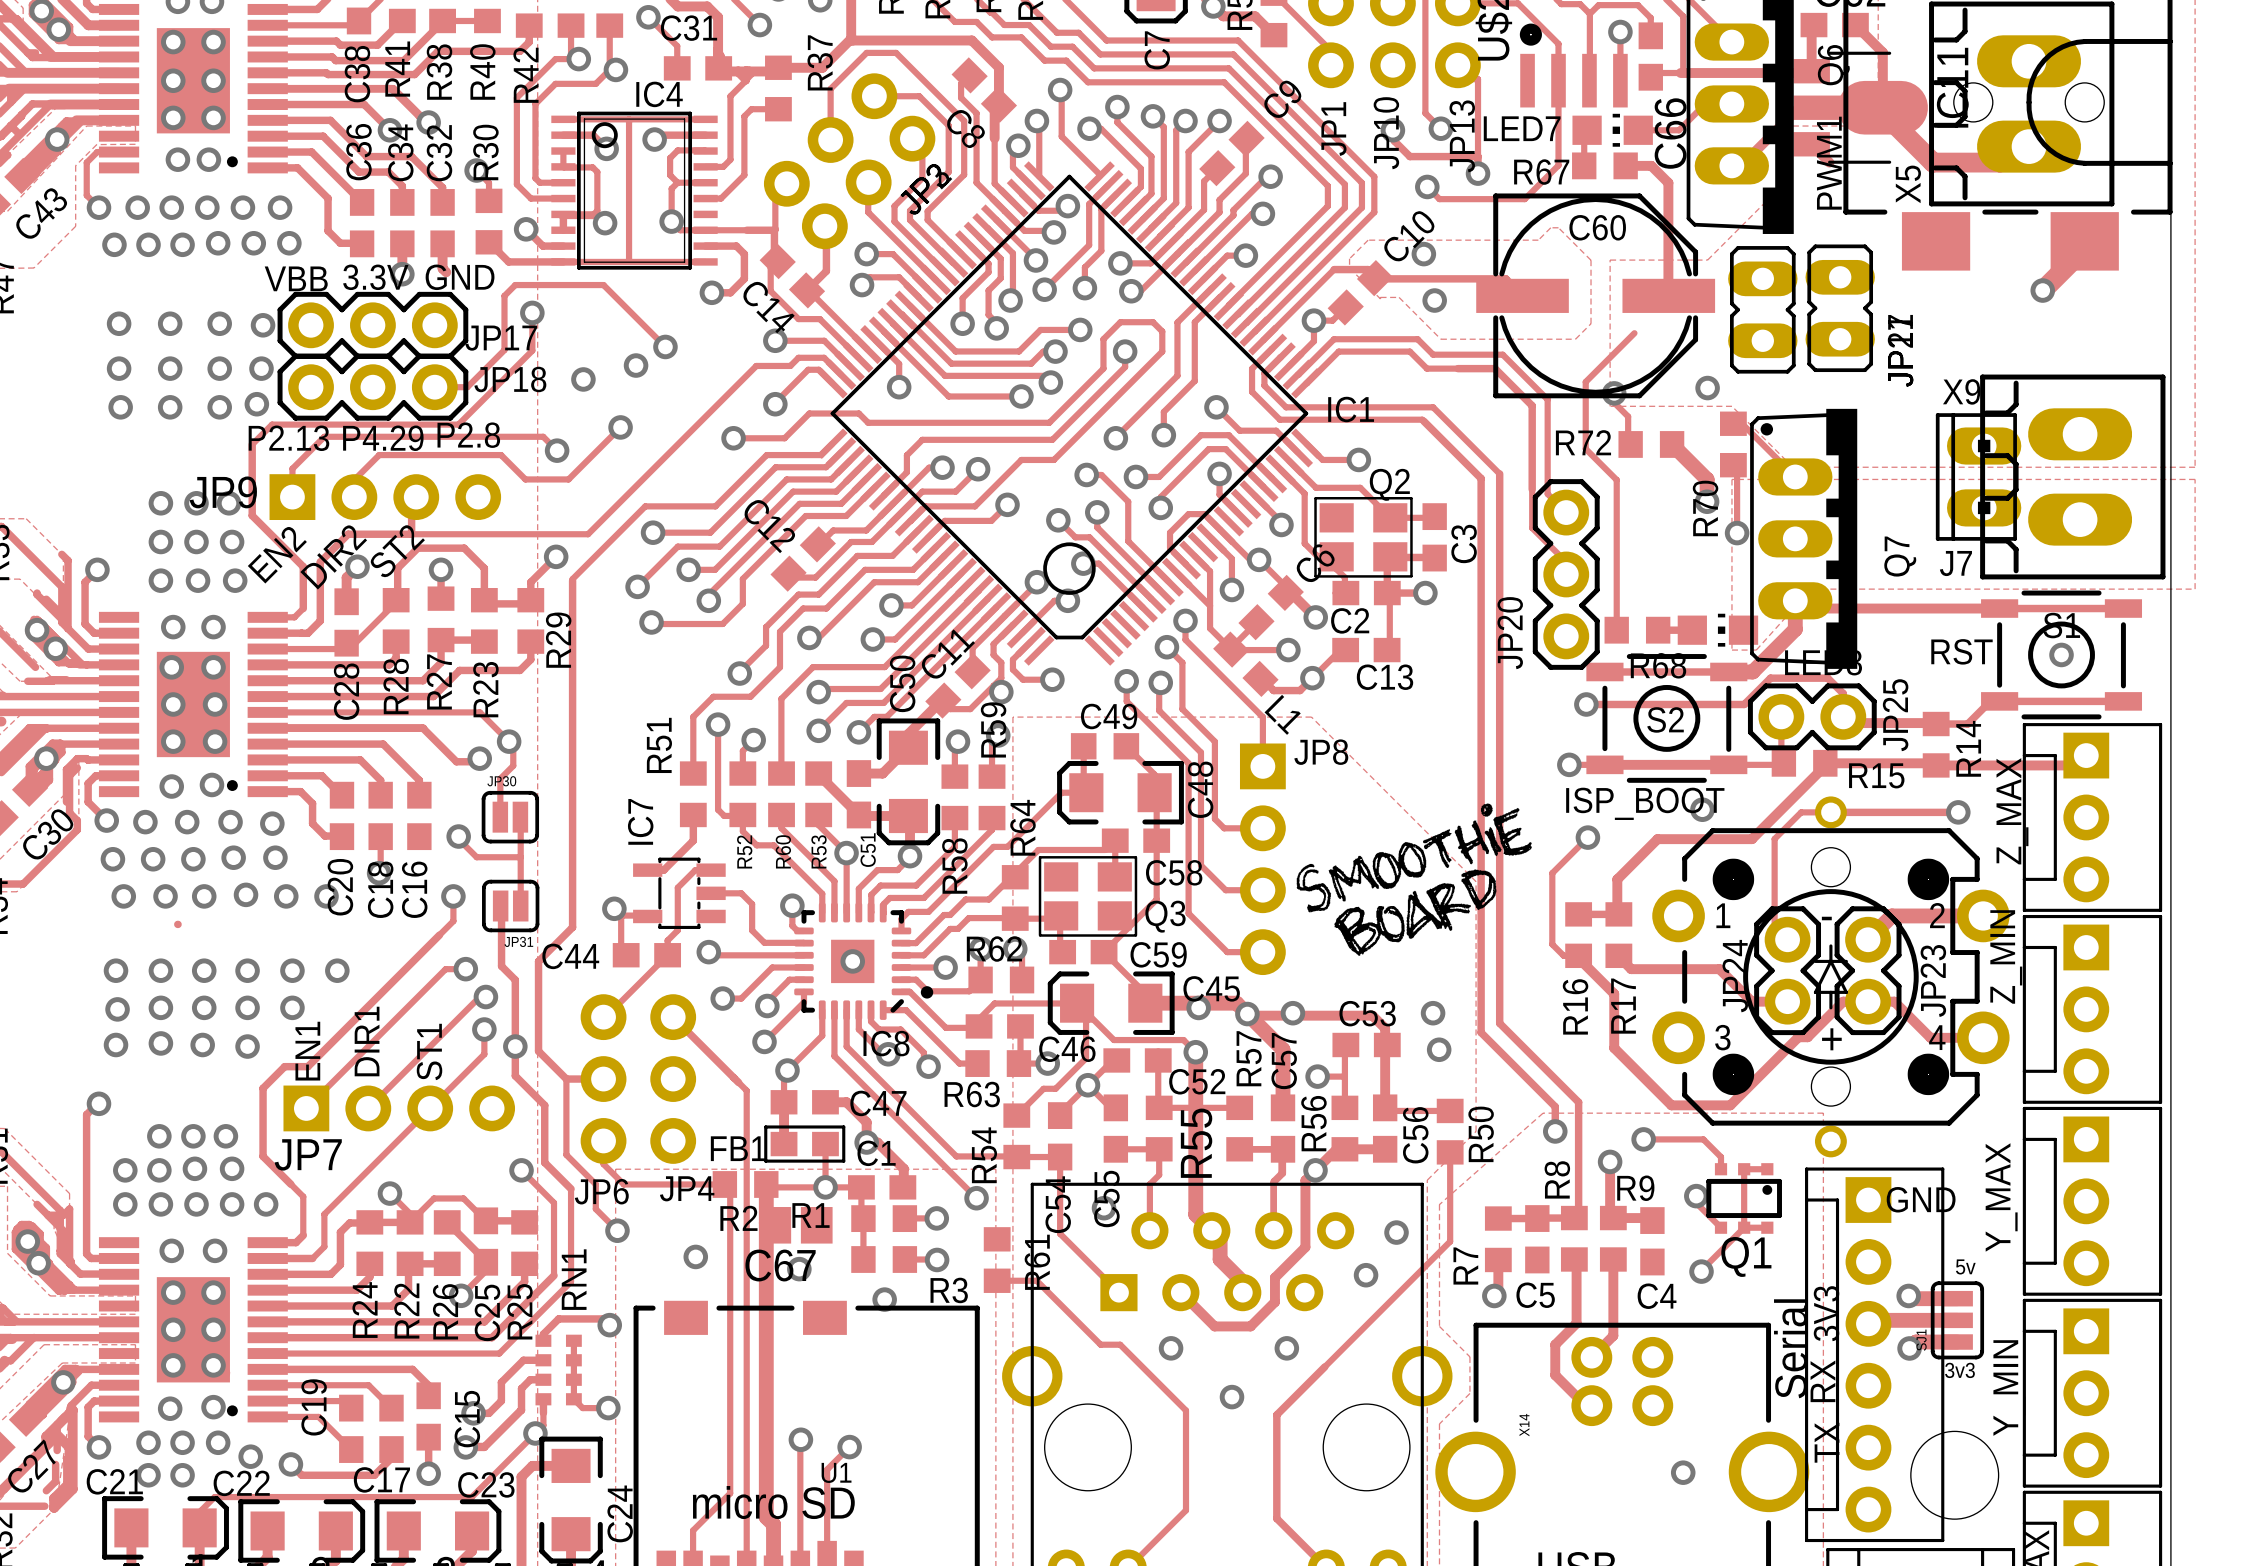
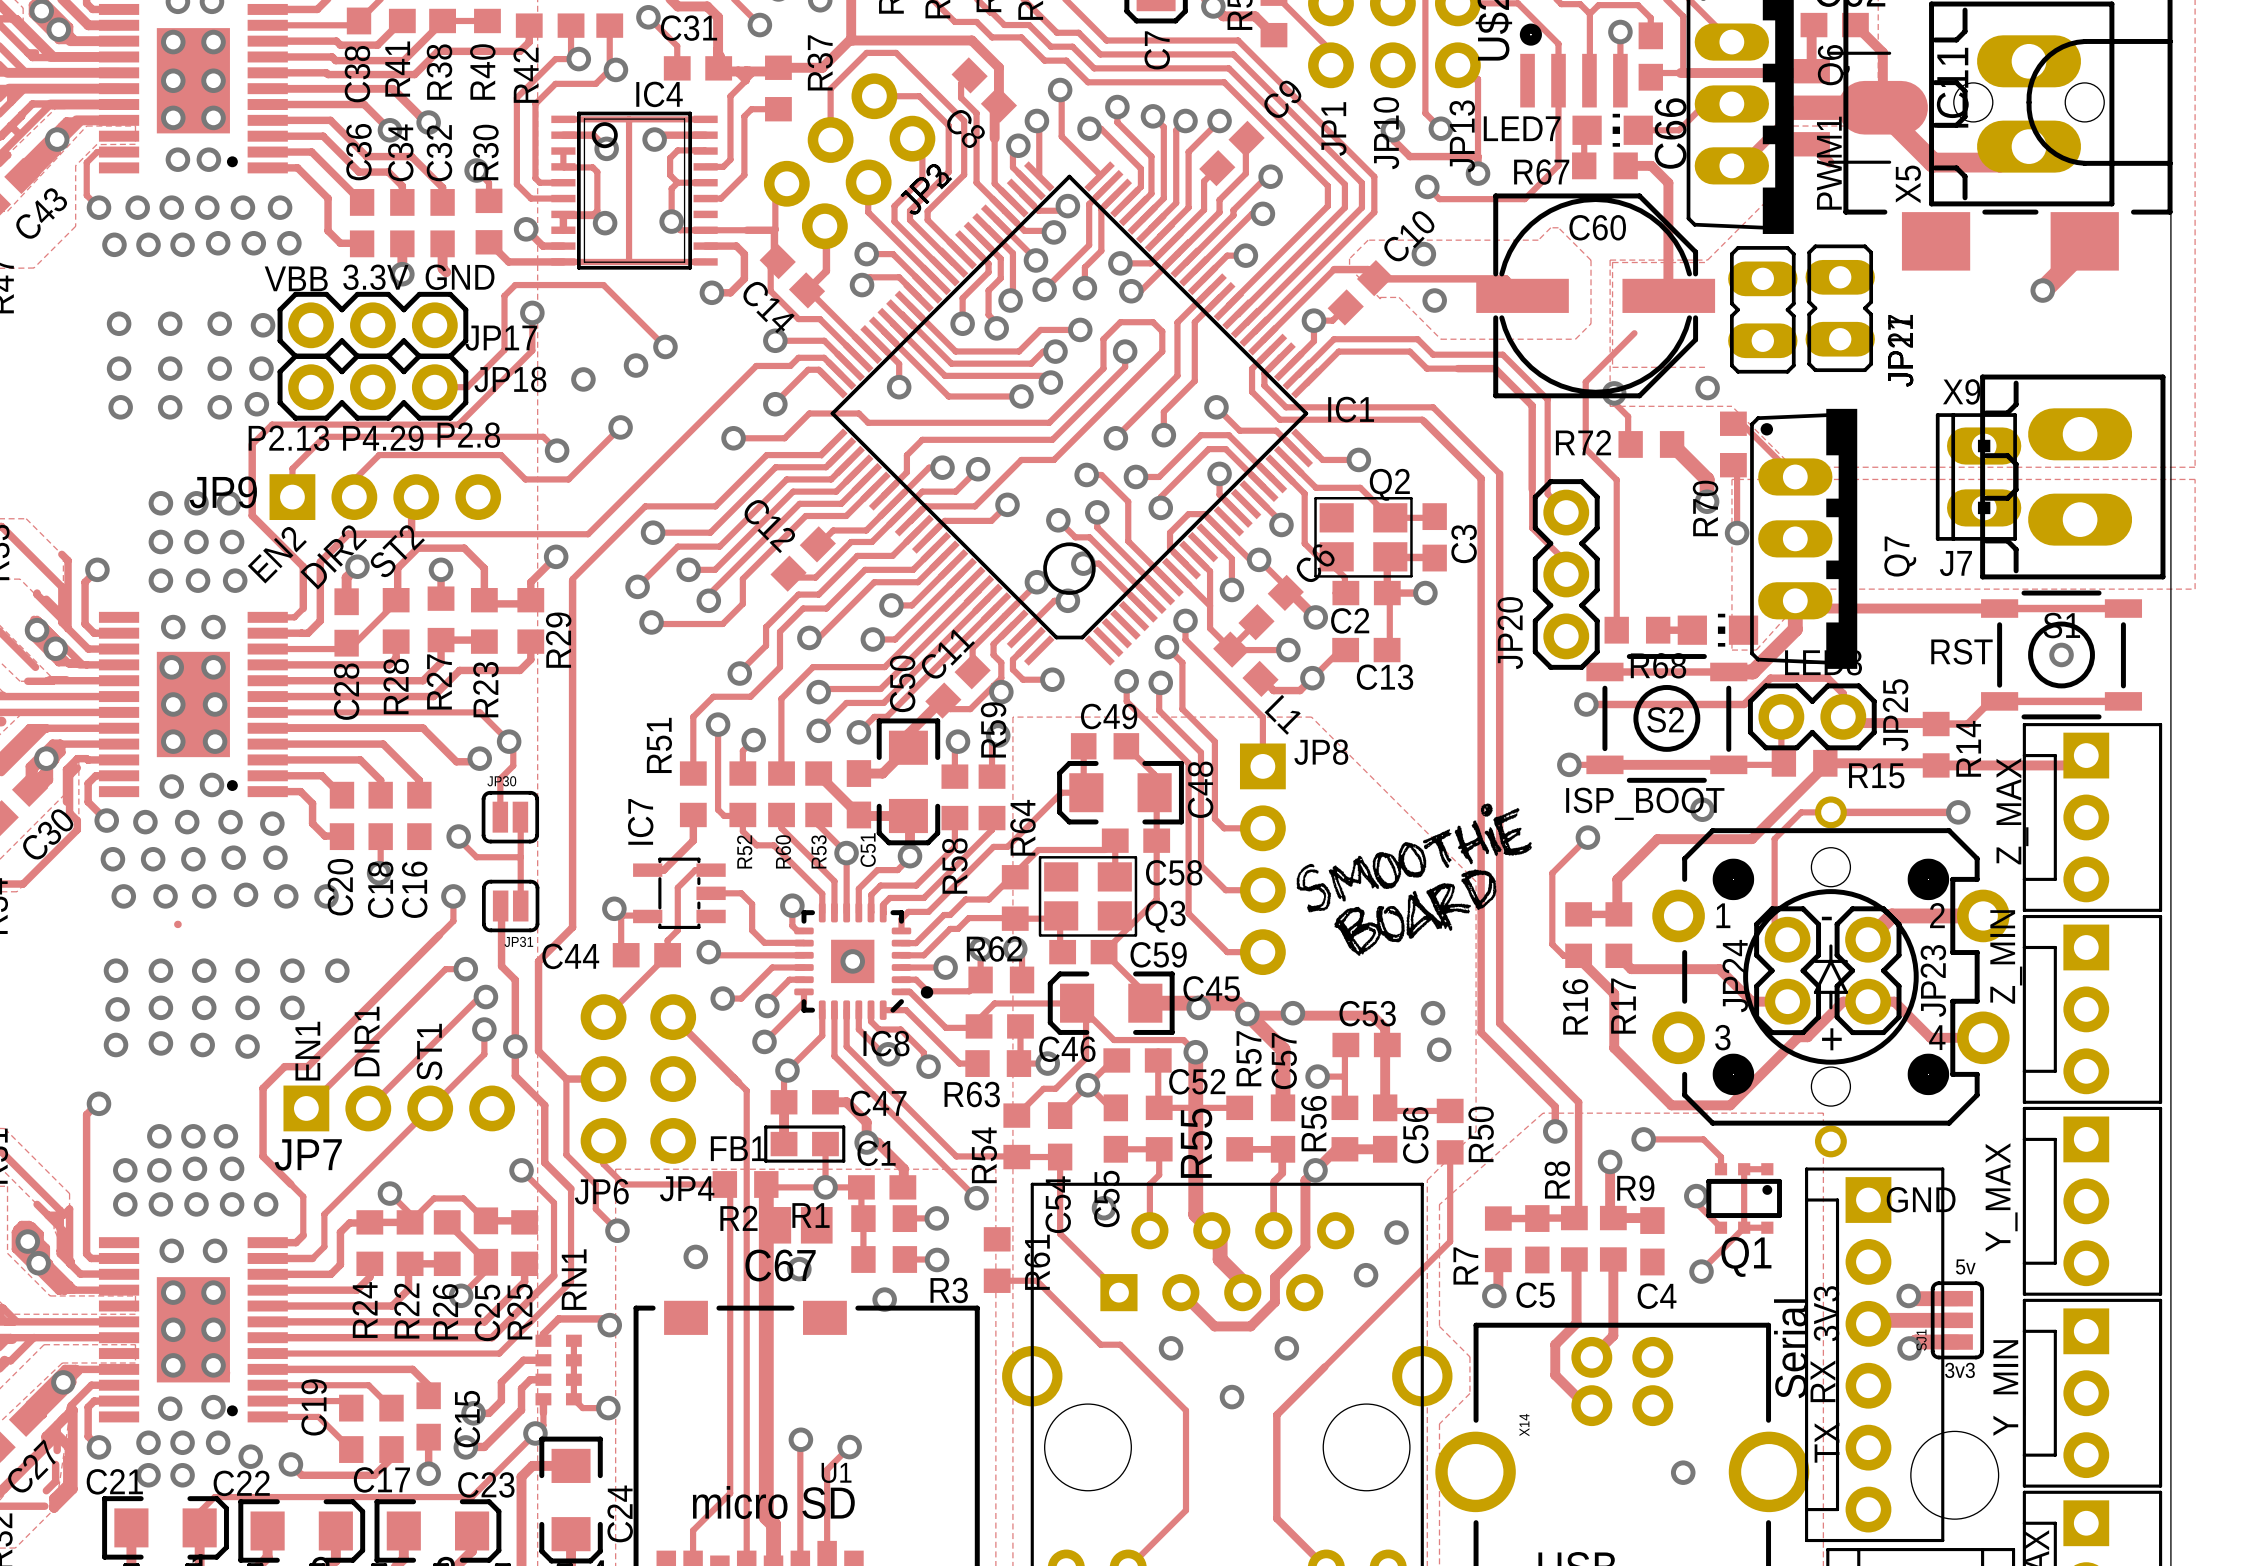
zone outline: none -> (1707, 262) (1612, 262) (1612, 367) (1707, 367)

